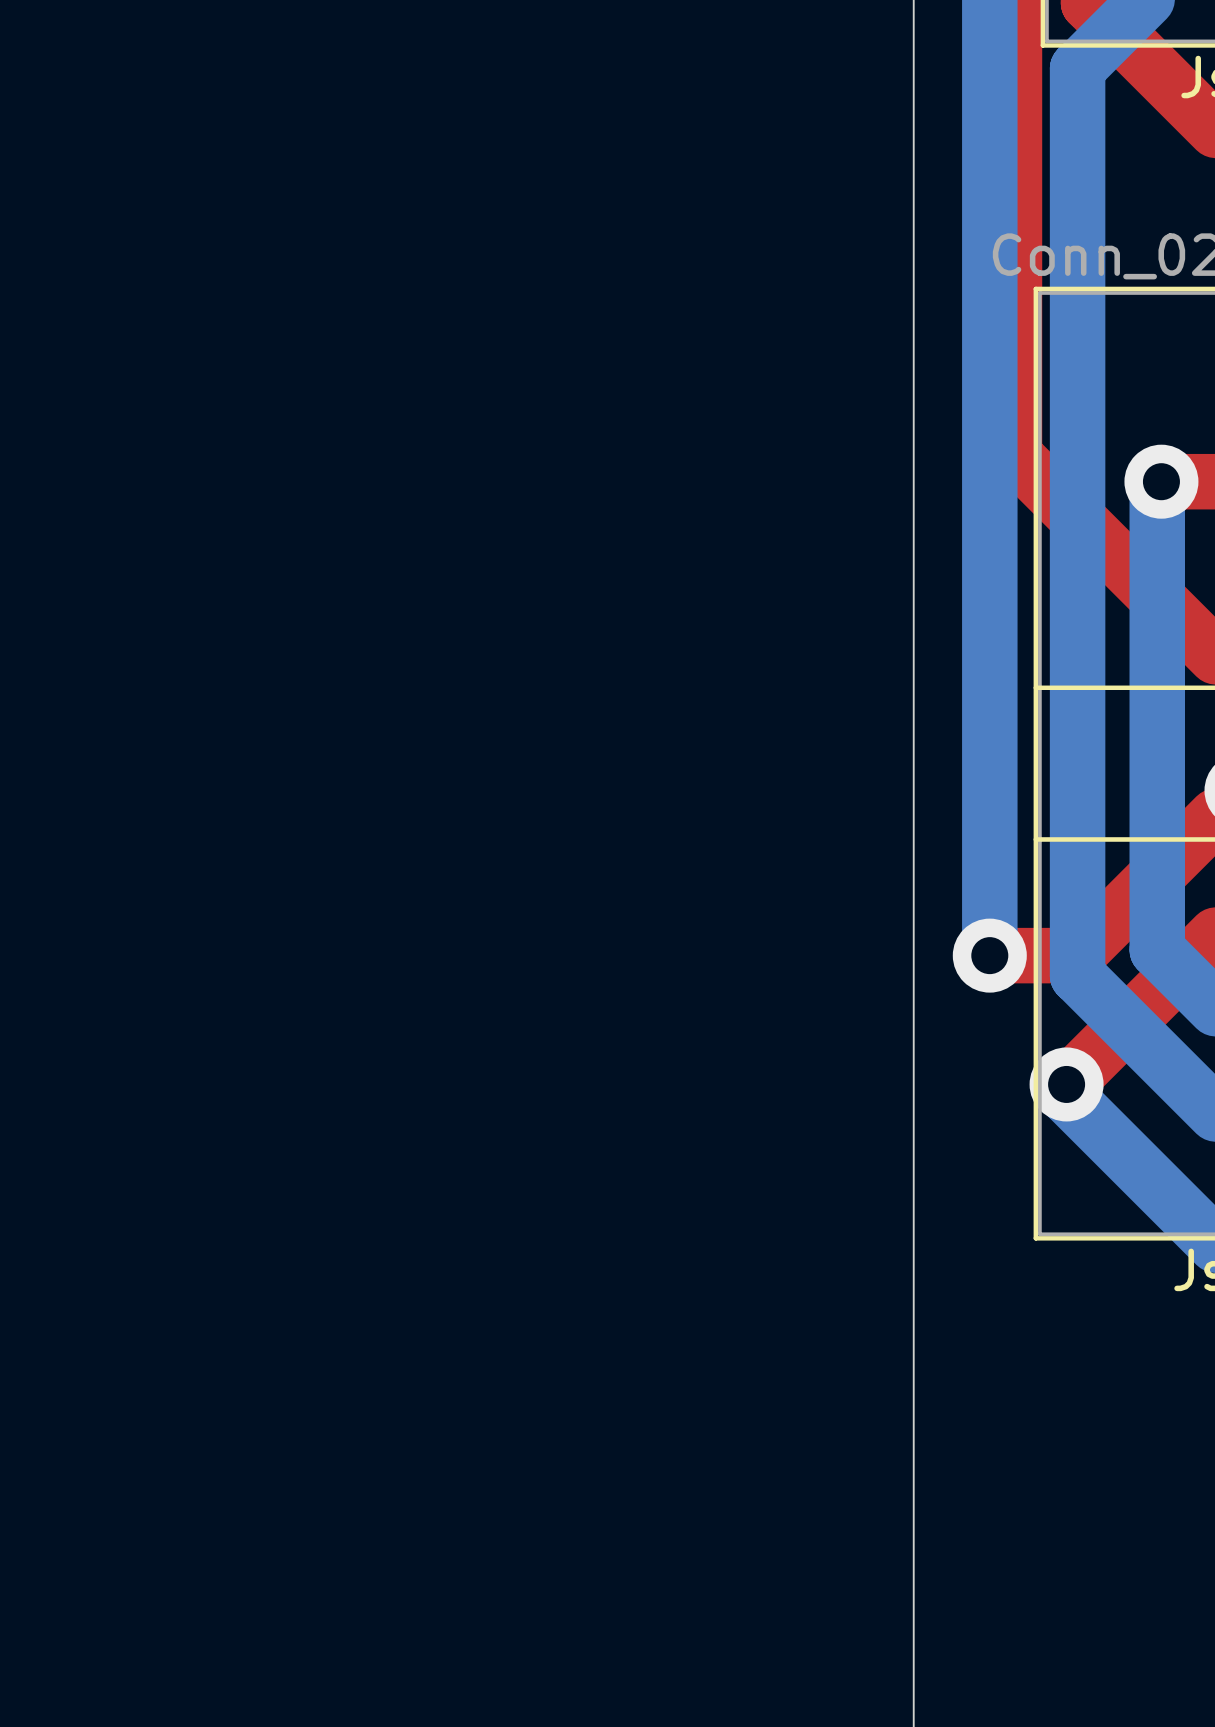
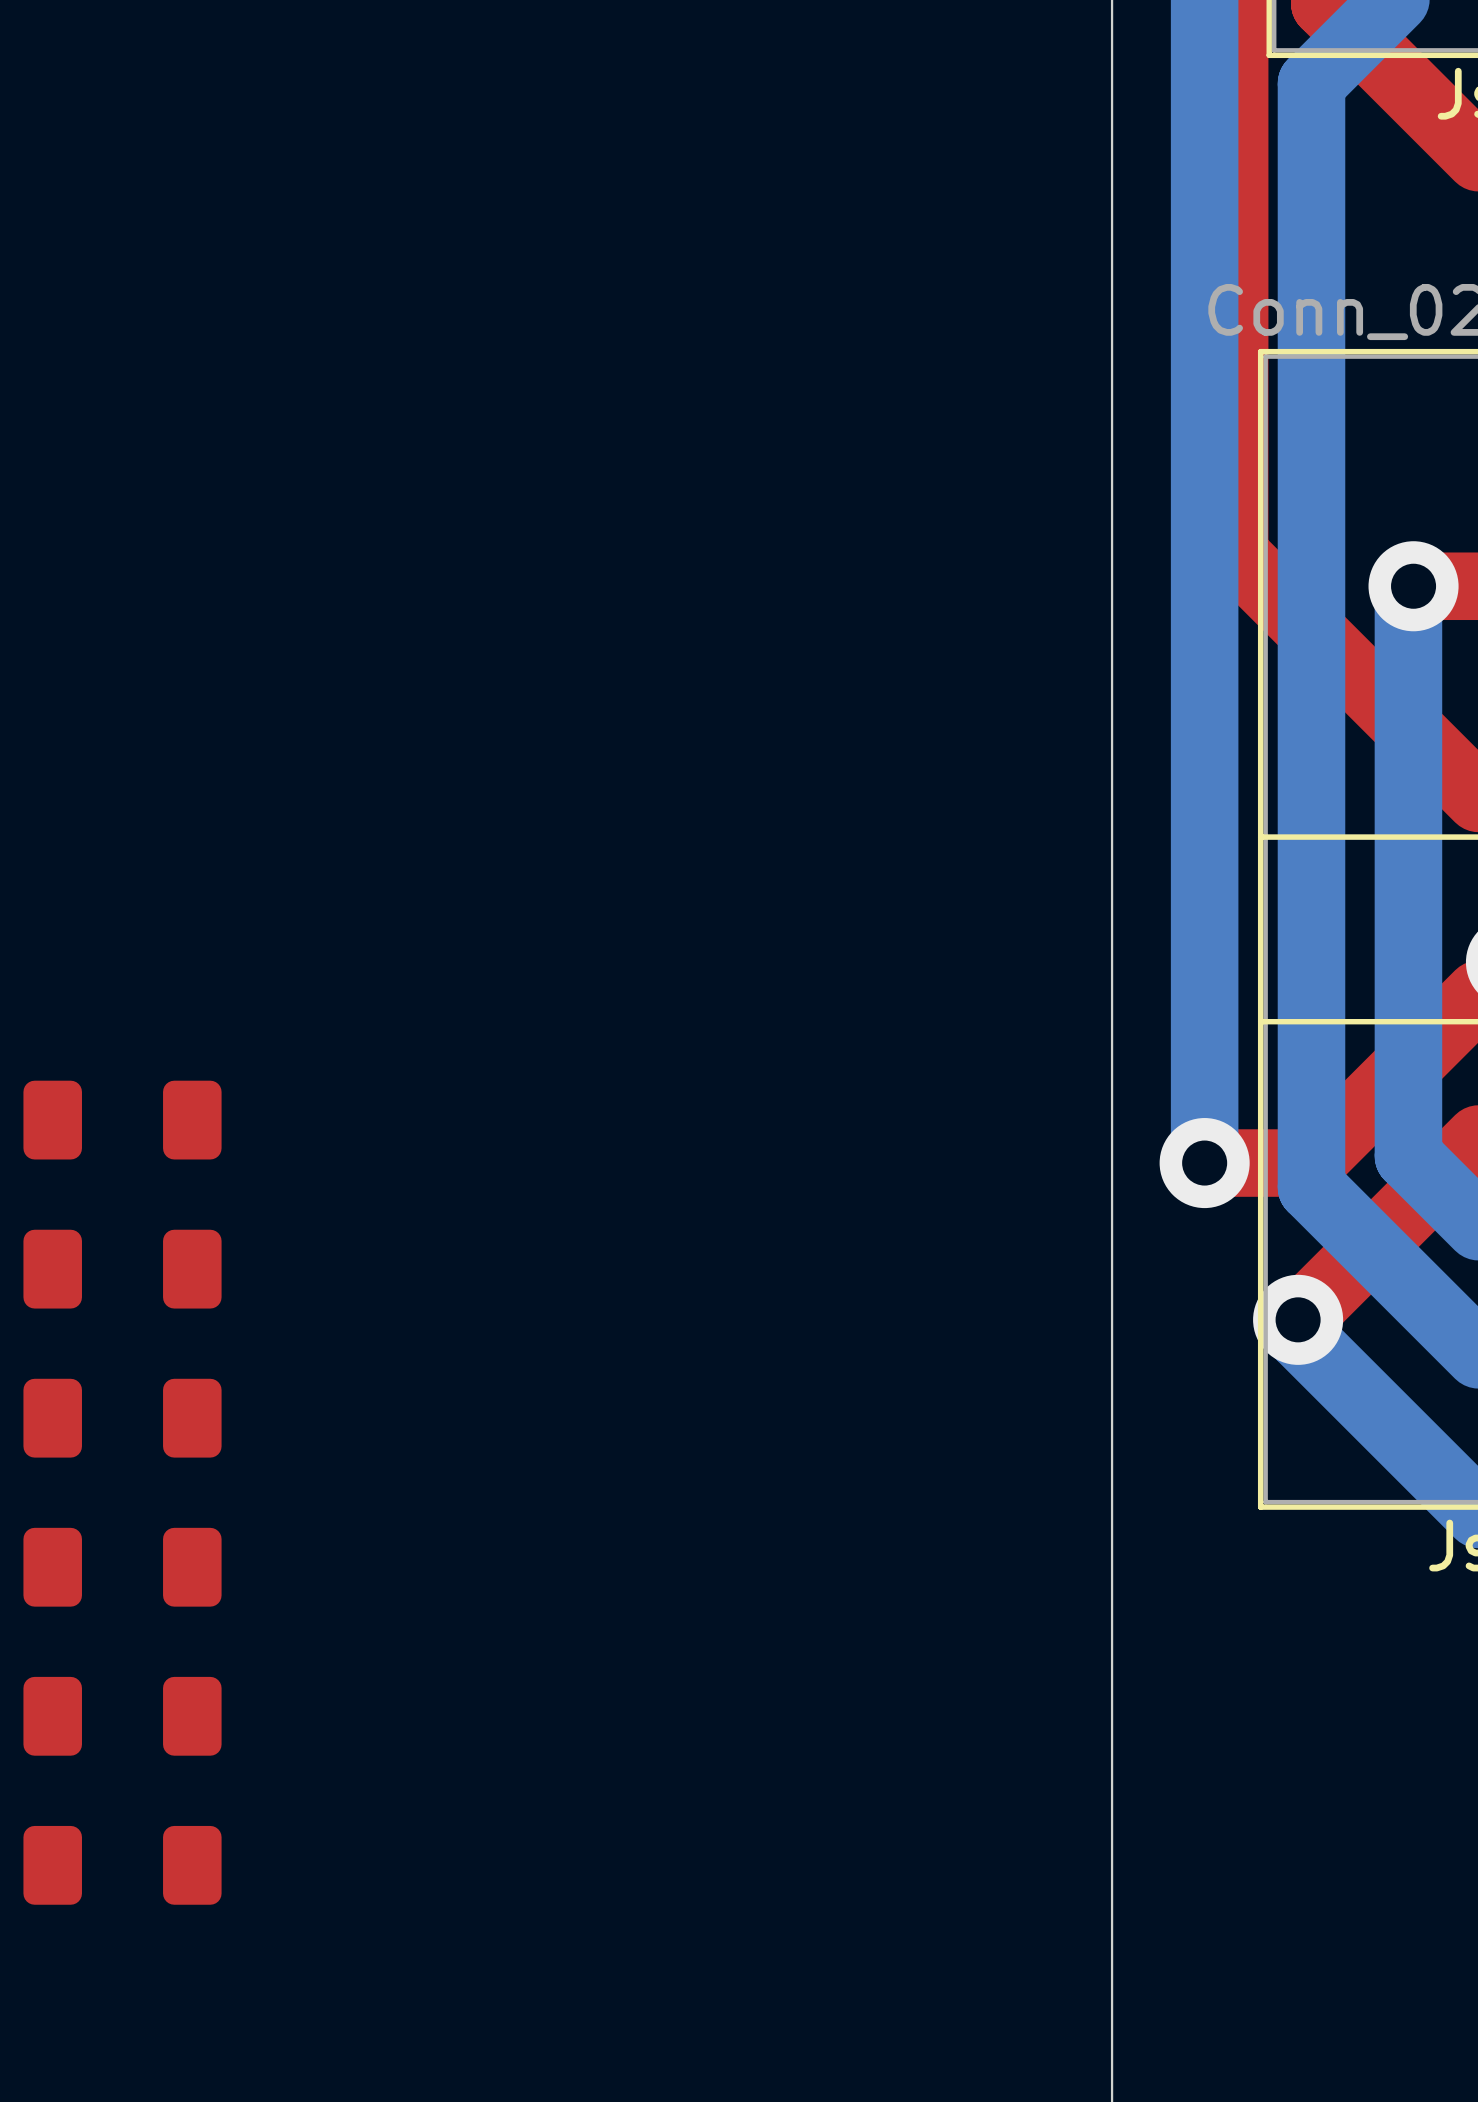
part: none -> (122, 1120)
part: none -> (122, 1269)
part: none -> (122, 1418)
part: none -> (122, 1567)
part: none -> (122, 1716)
part: none -> (122, 1865)

